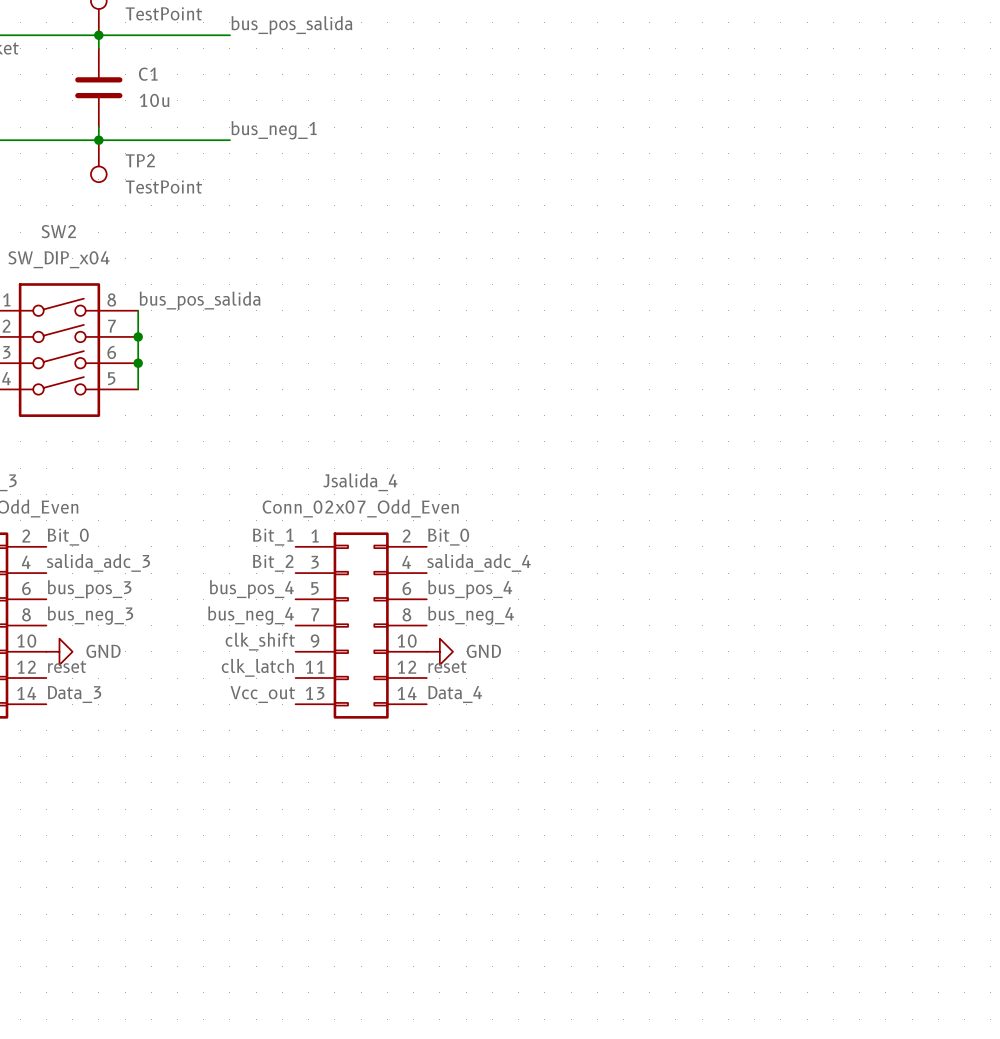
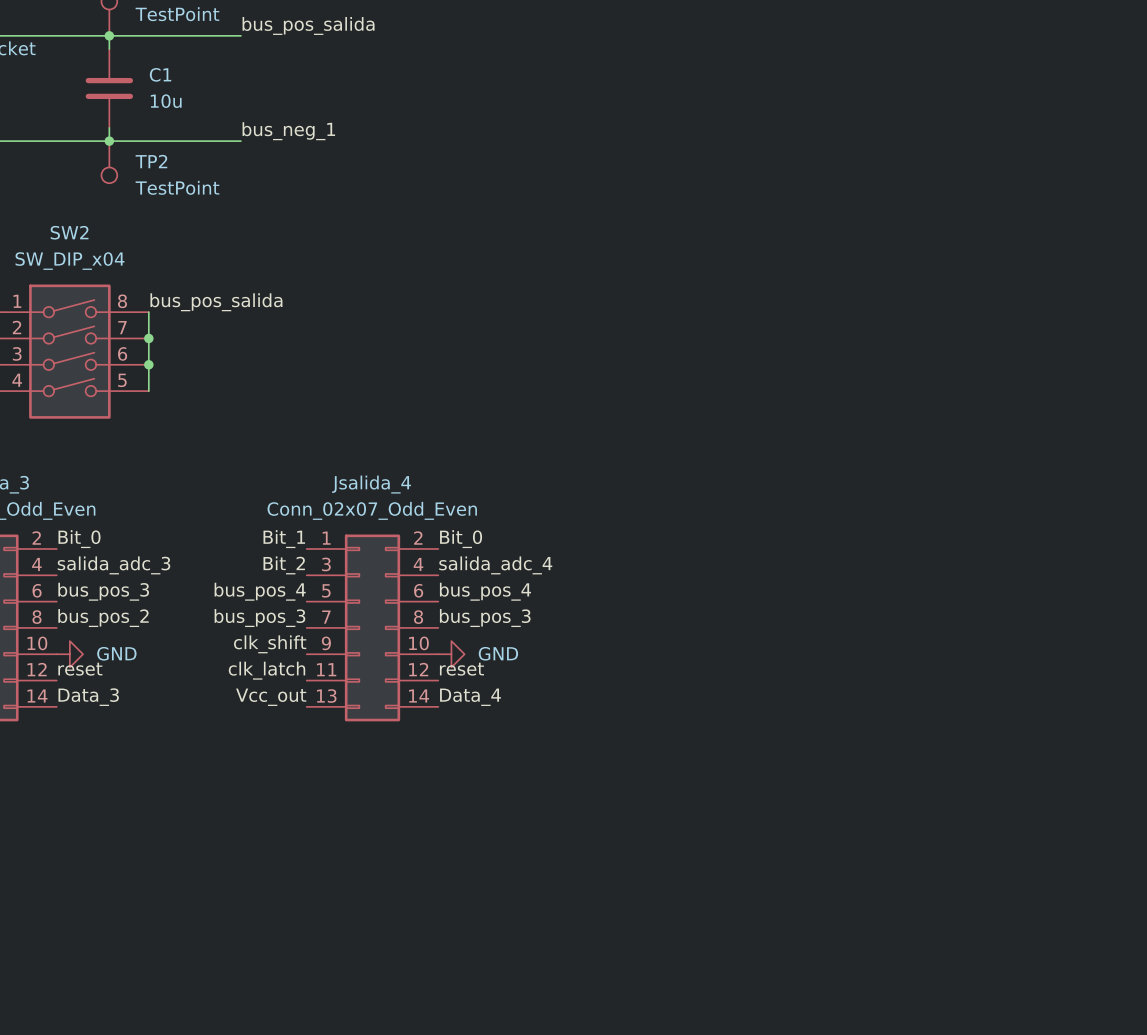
label: bus_neg_3 (90, 615) -> bus_pos_2 (103, 618)
label: bus_neg_4 (251, 615) -> bus_pos_3 (259, 618)
label: bus_neg_4 (471, 615) -> bus_pos_3 (485, 618)

